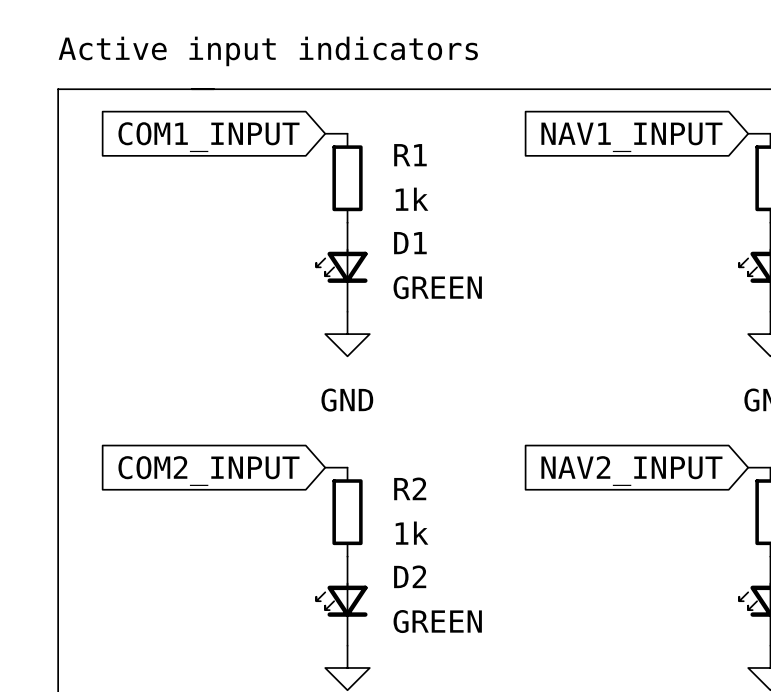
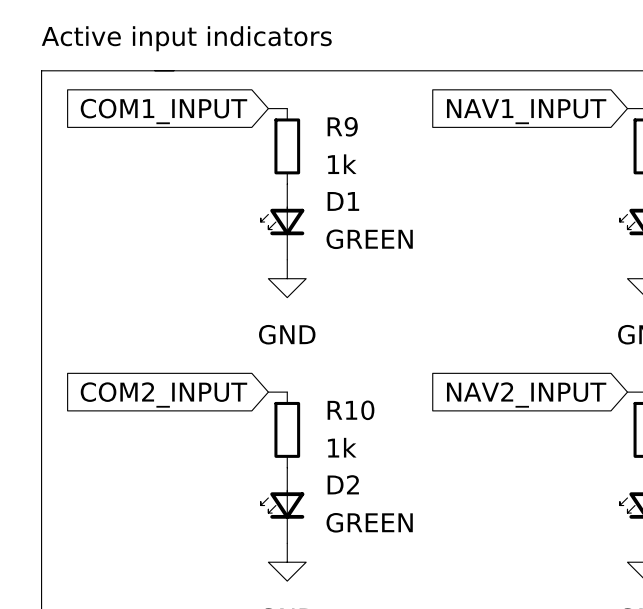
R1 name: R1 (410, 155) -> R9 (342, 126)
R2 name: R2 (410, 488) -> R10 (350, 410)

